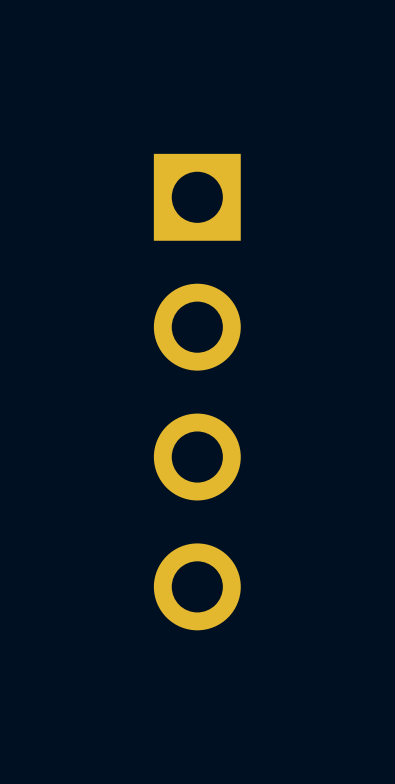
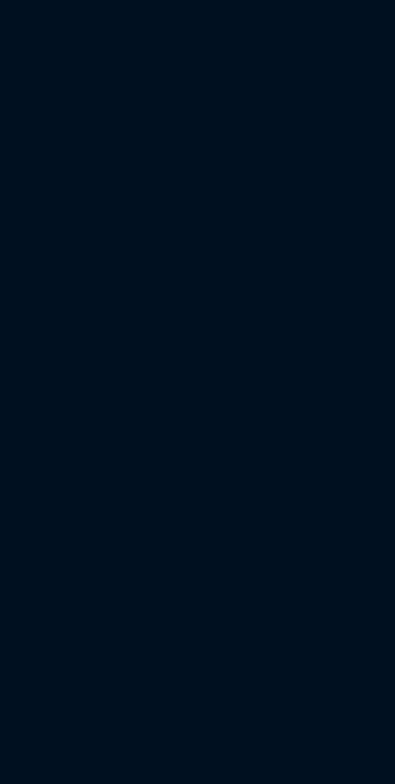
part: (197, 392) -> none

